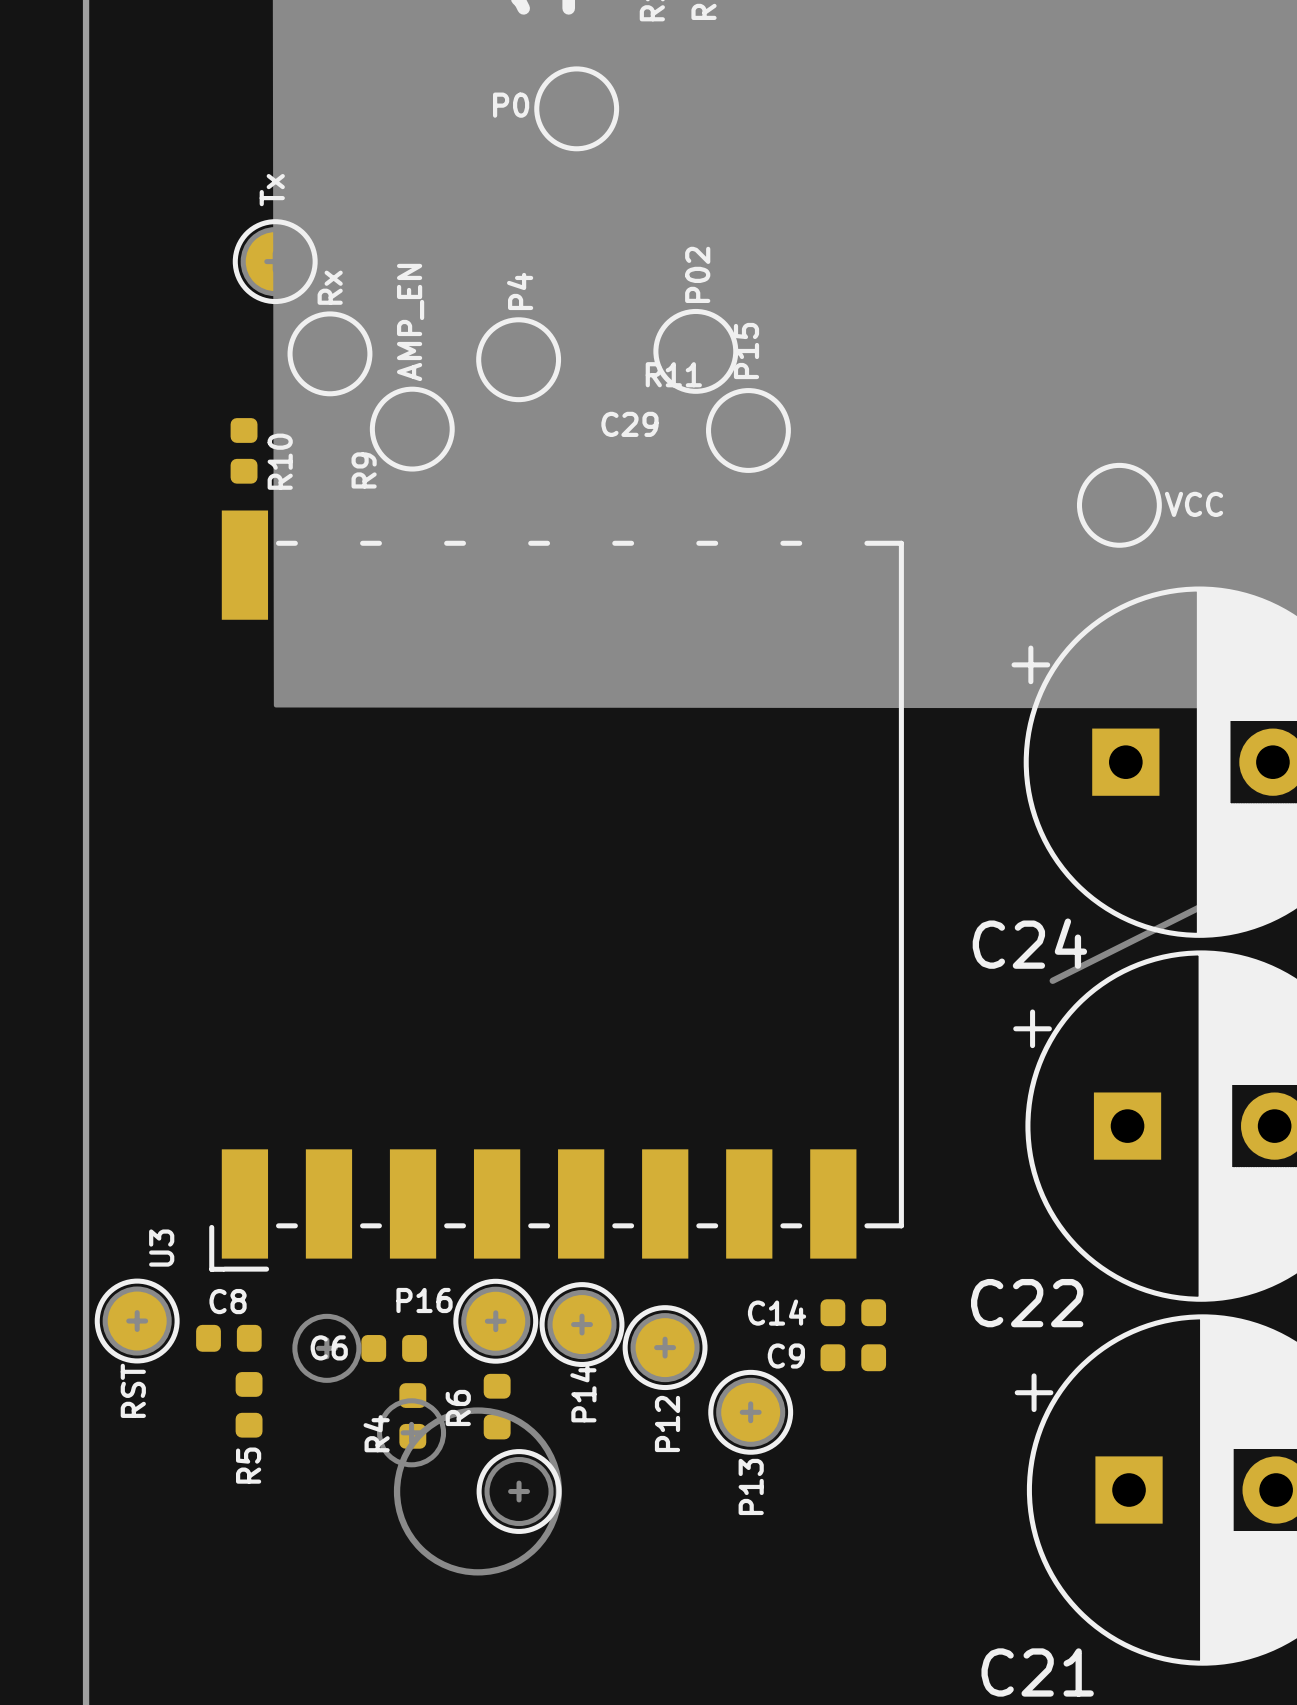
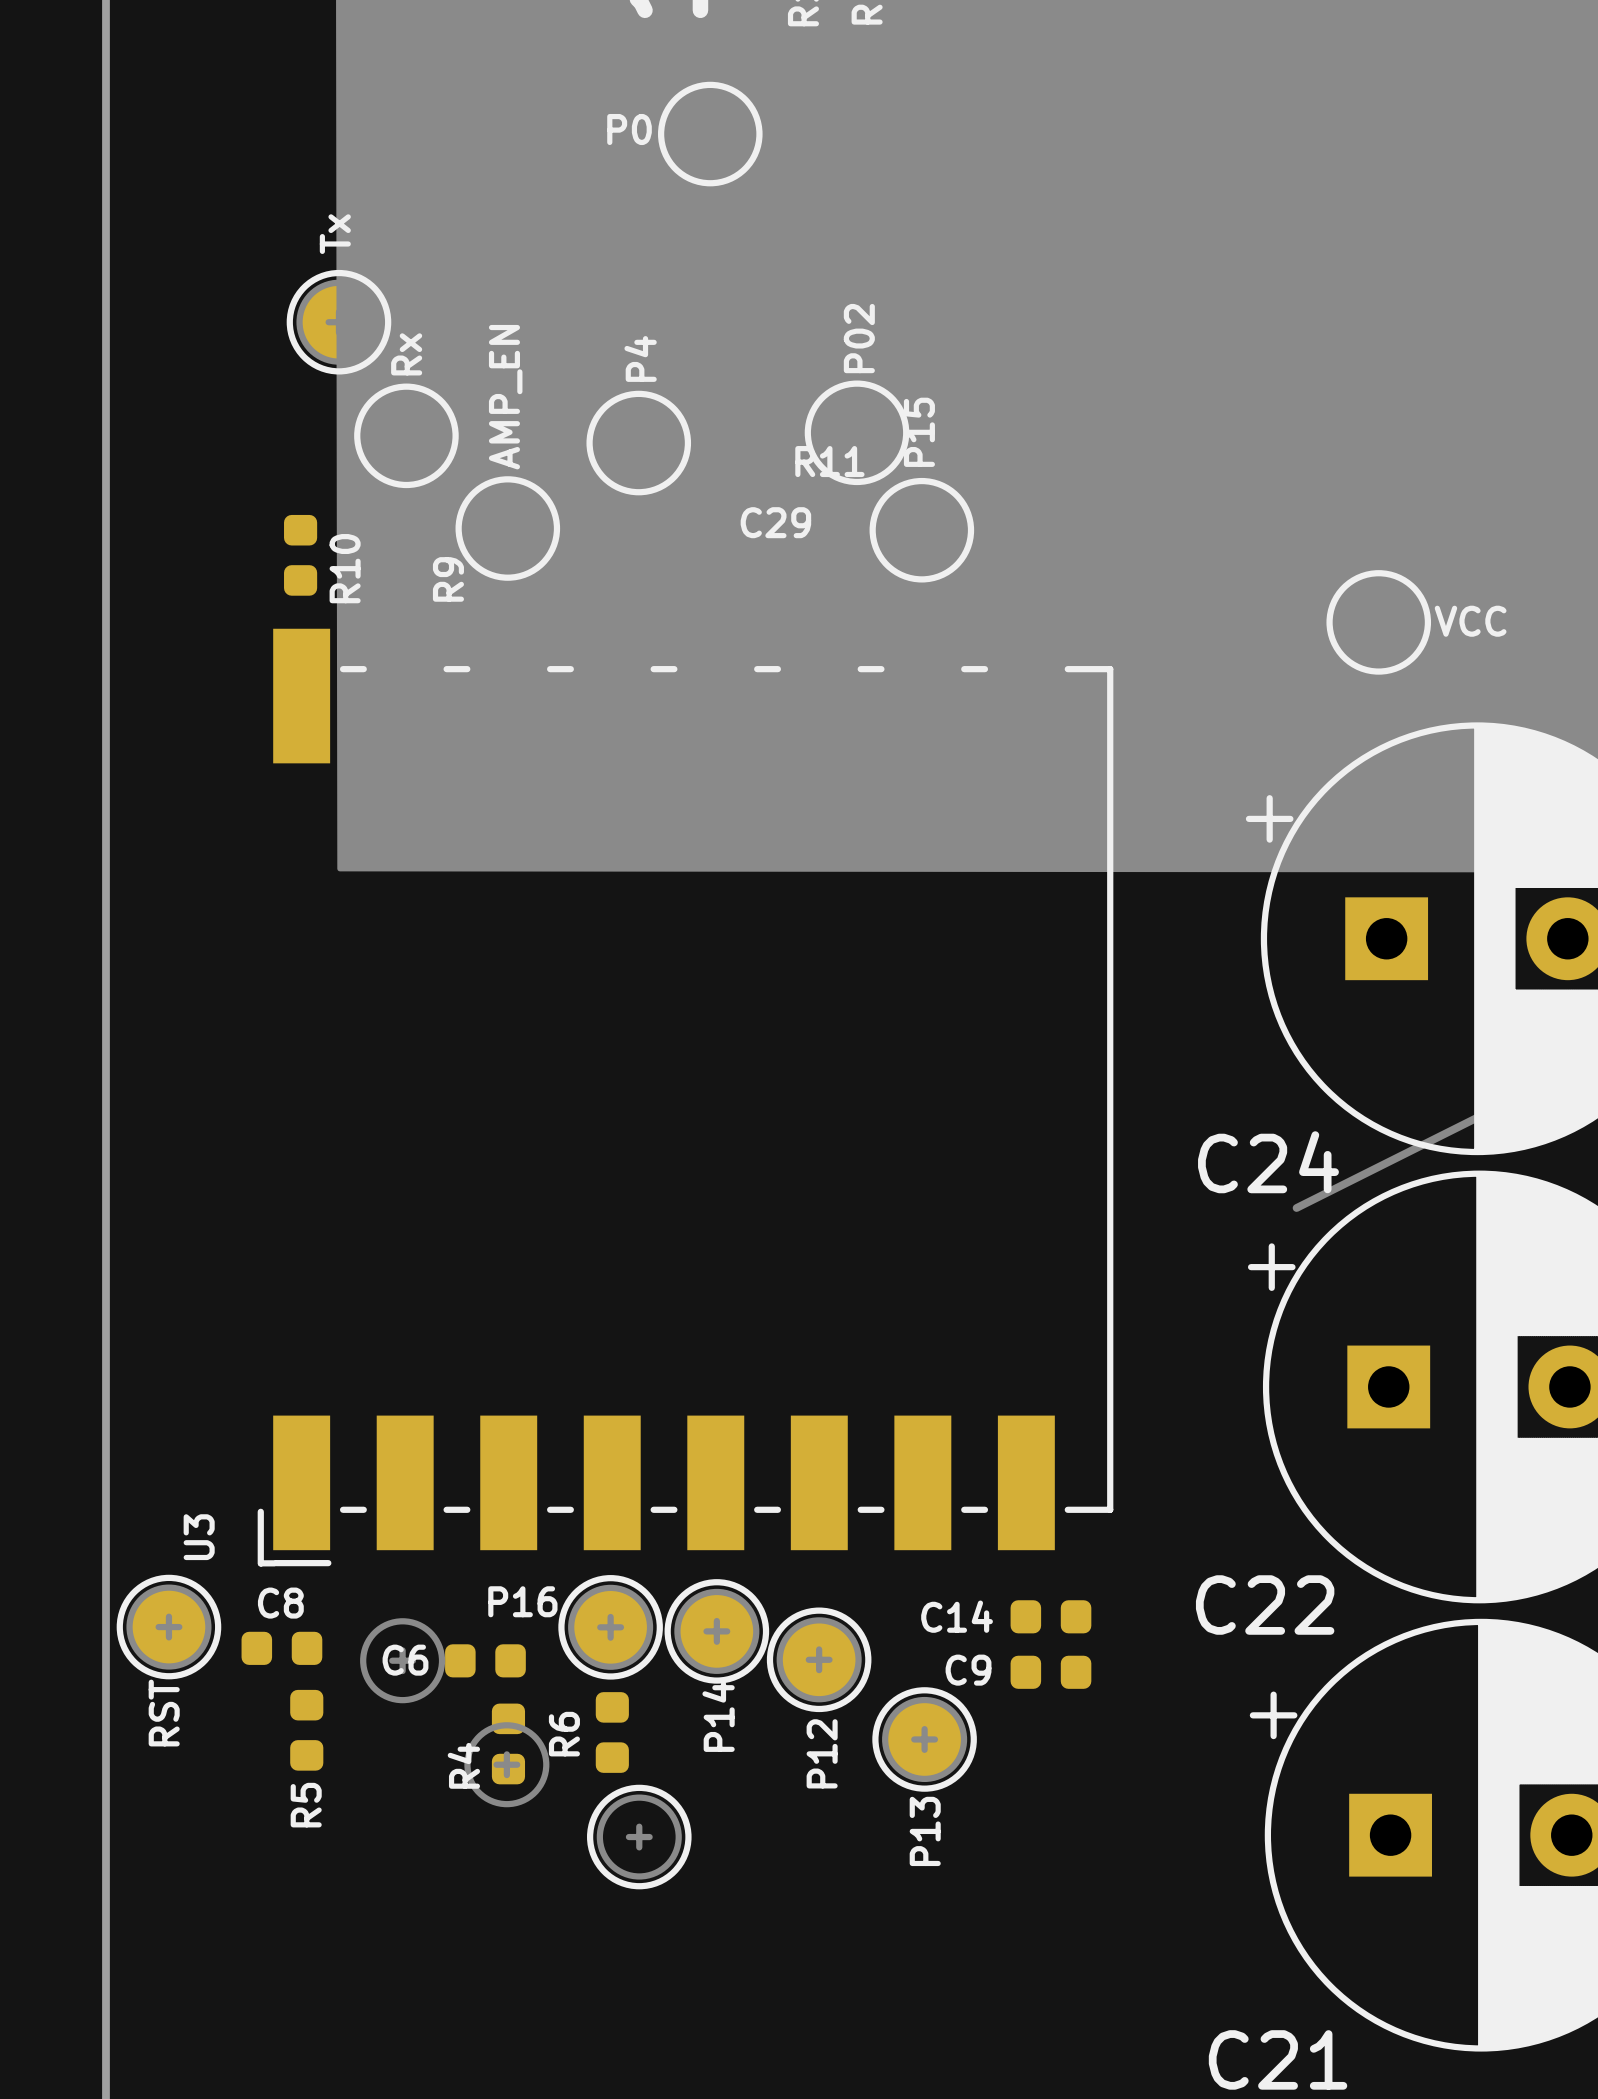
drawing: [393, 1407, 563, 1576] -> none

